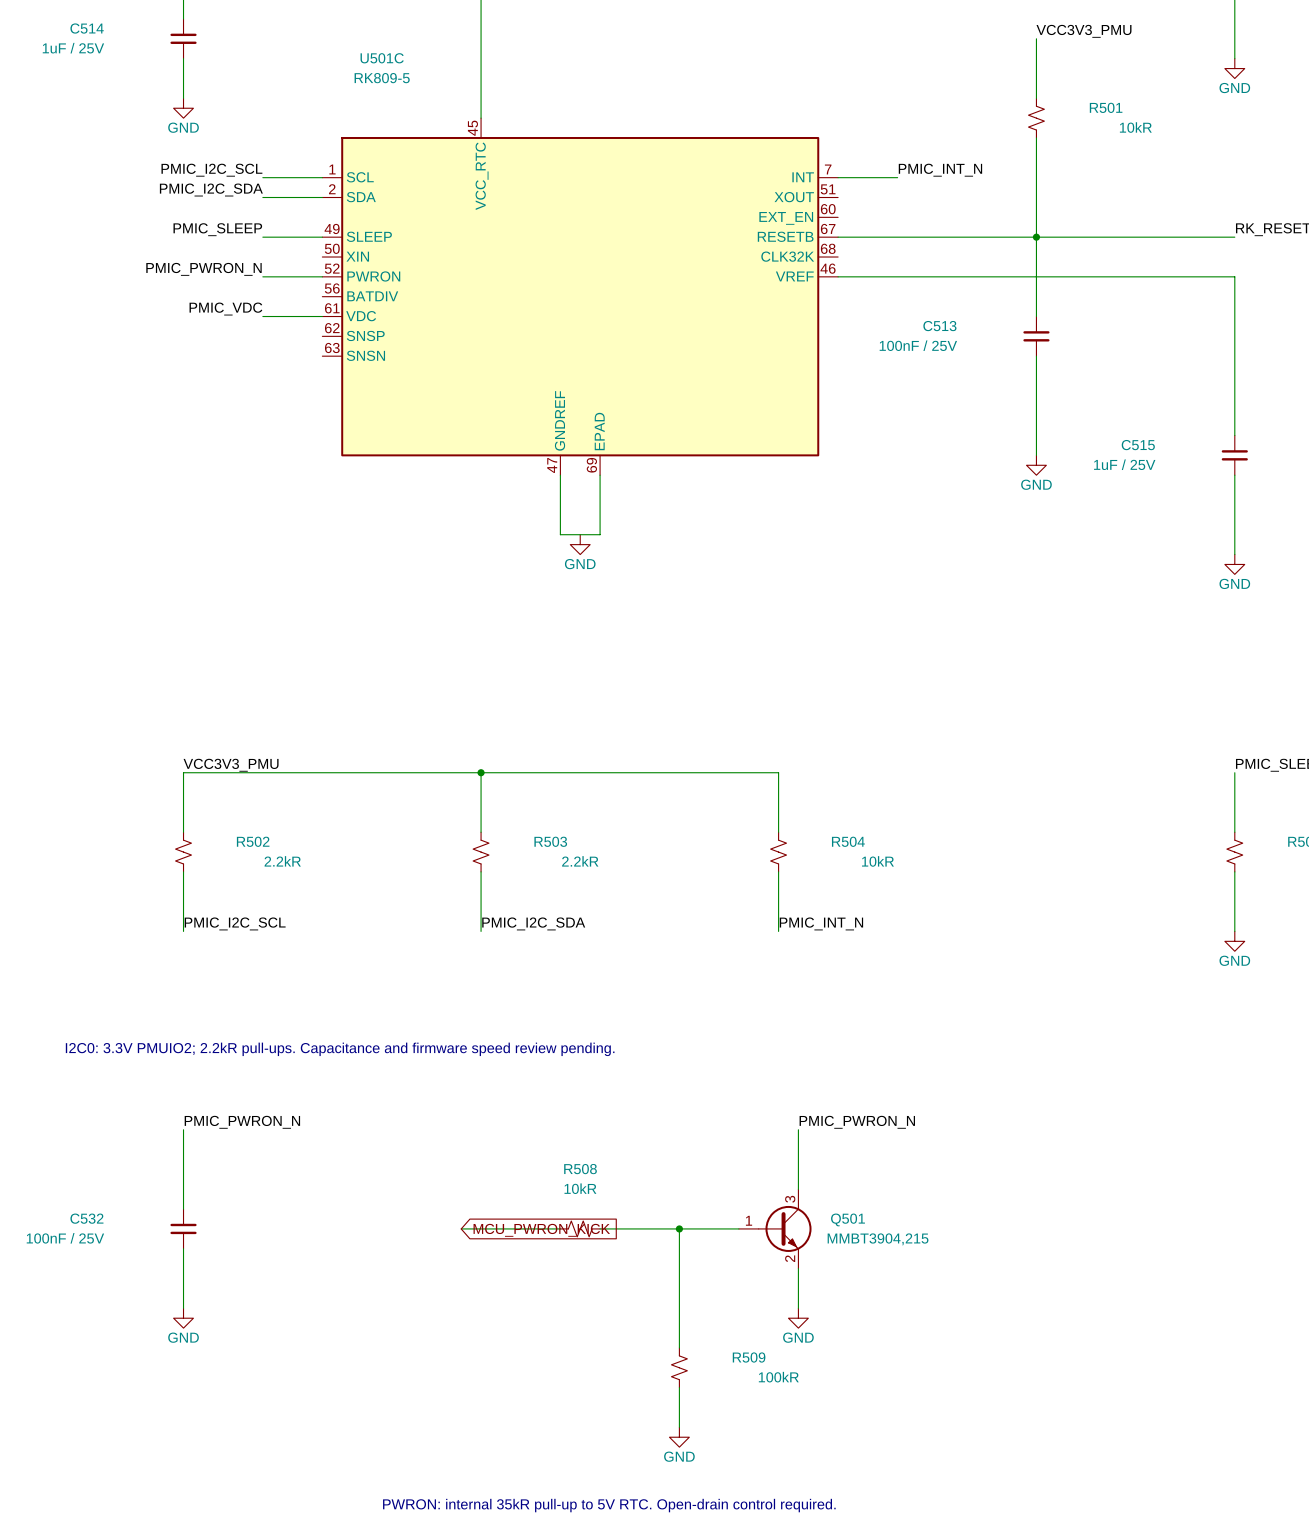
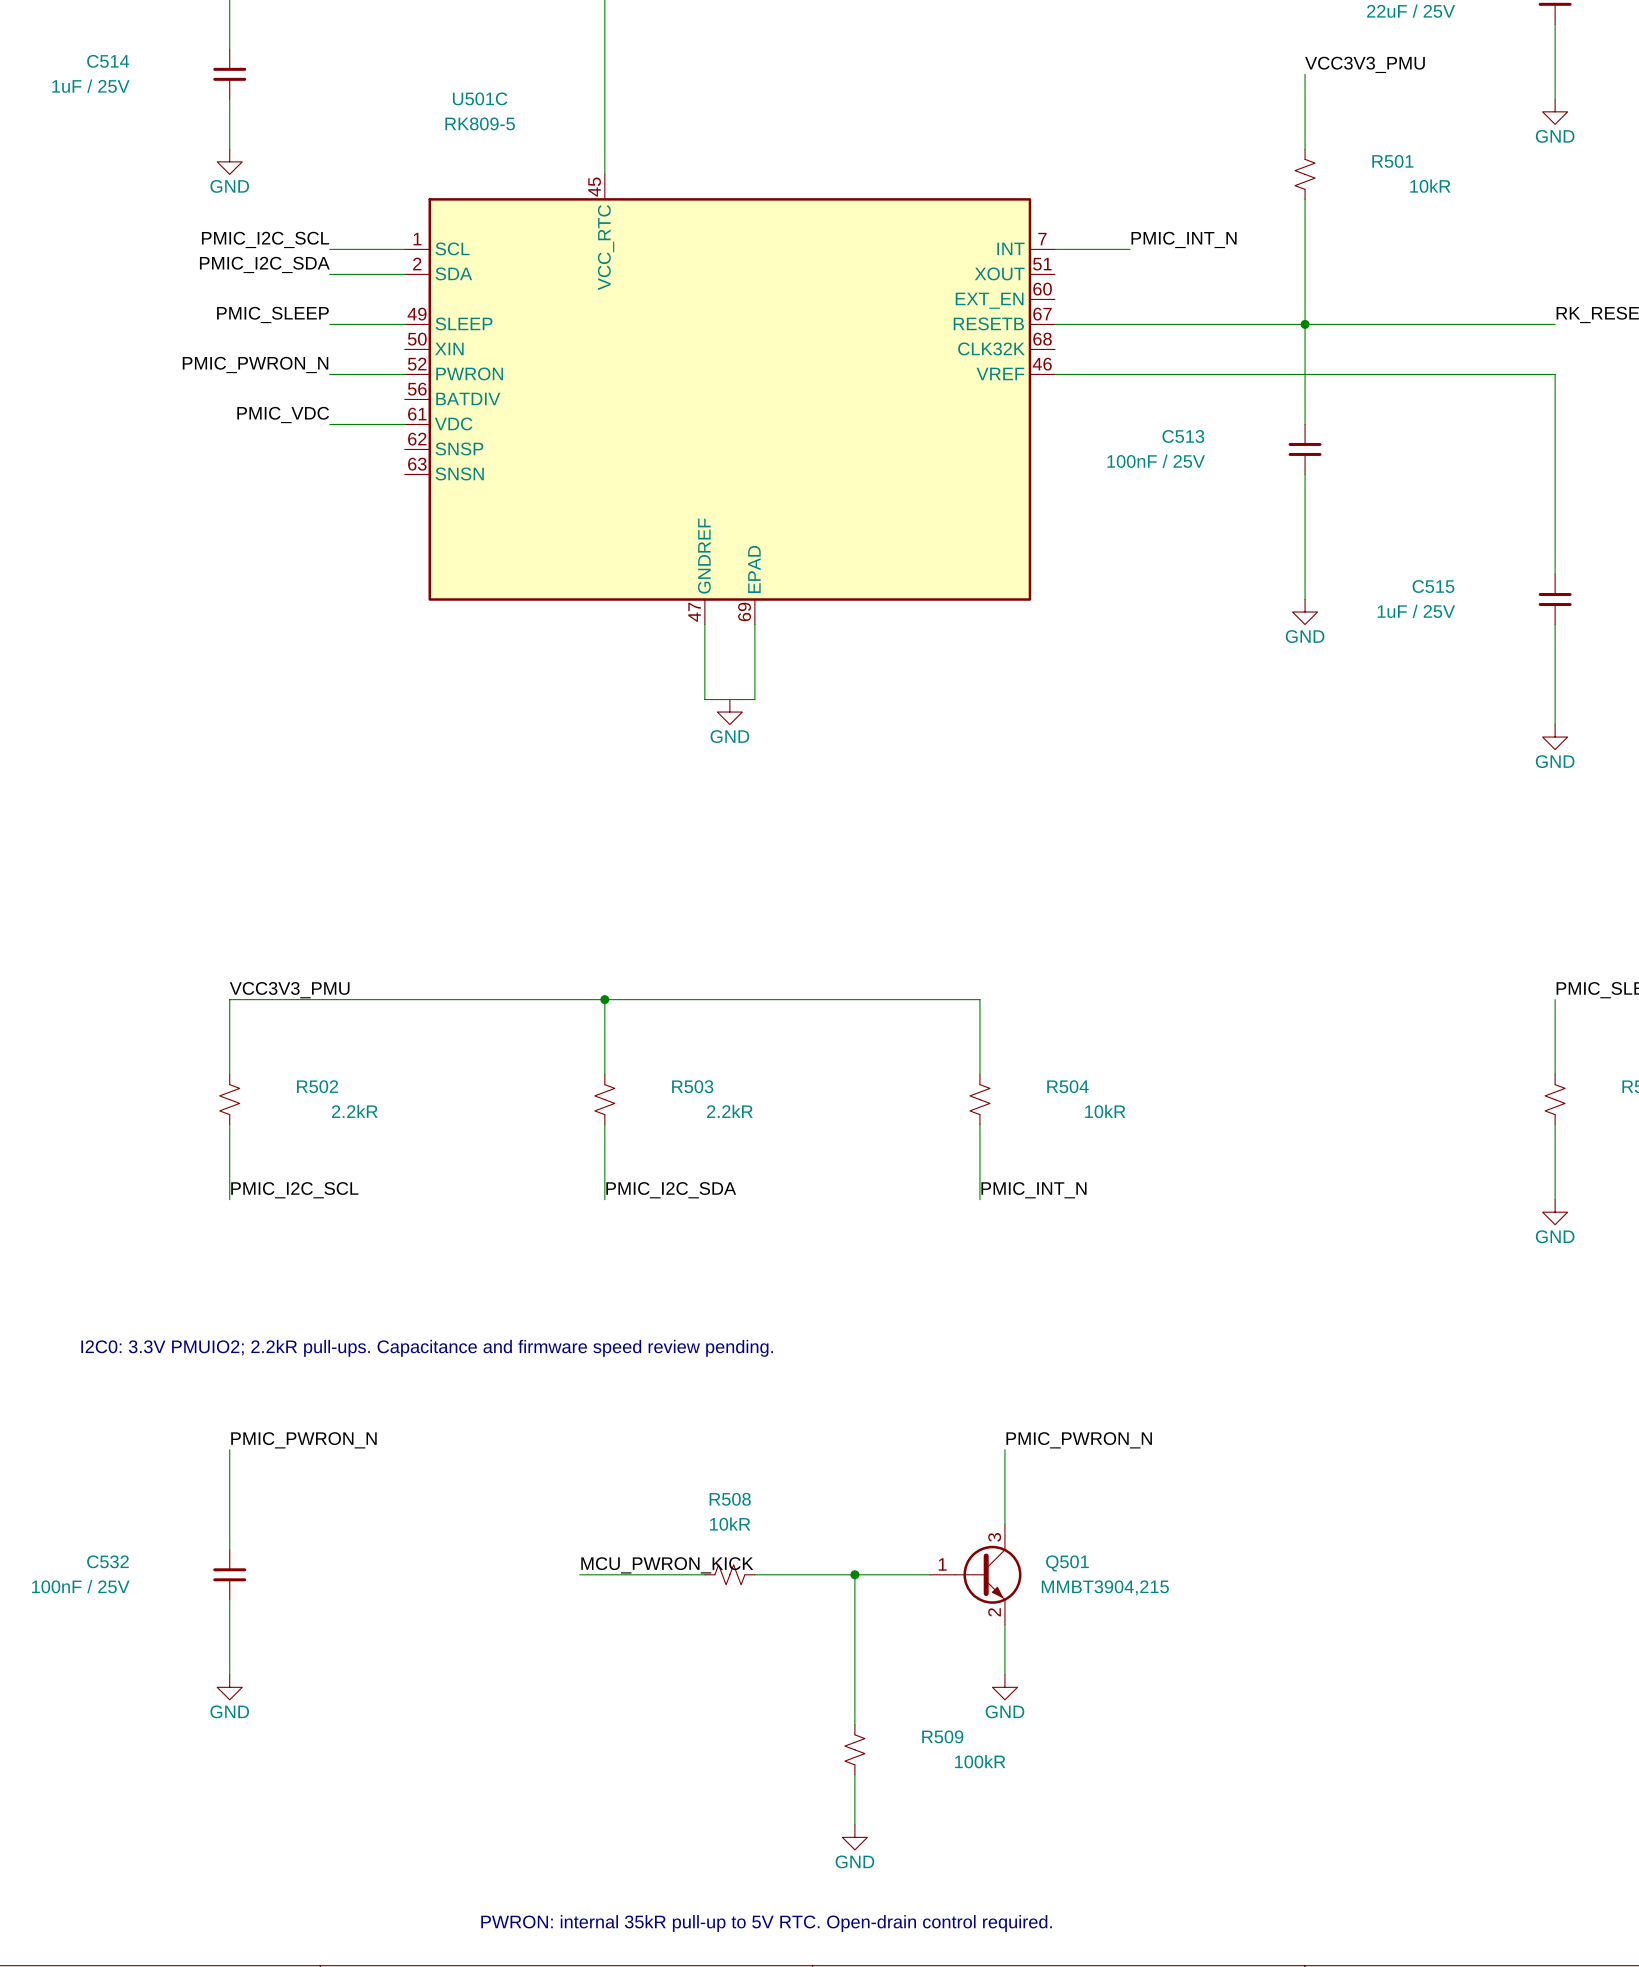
label: none -> MCU_PWRON_KICK (667, 1565)
global label: MCU_PWRON_KICK (541, 1230) -> none

